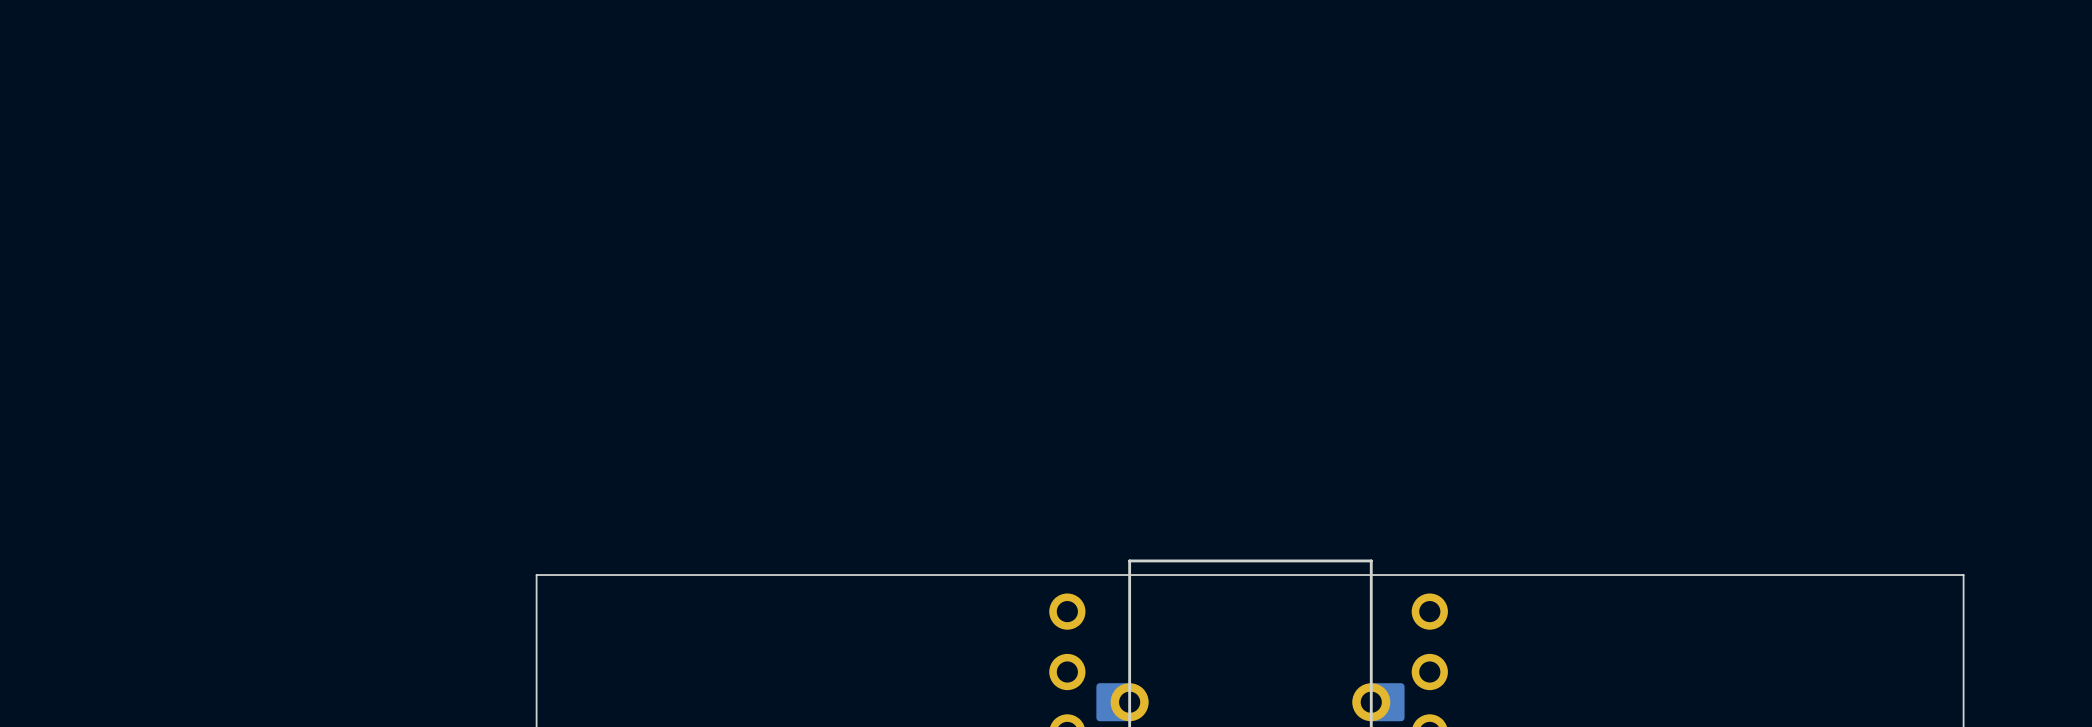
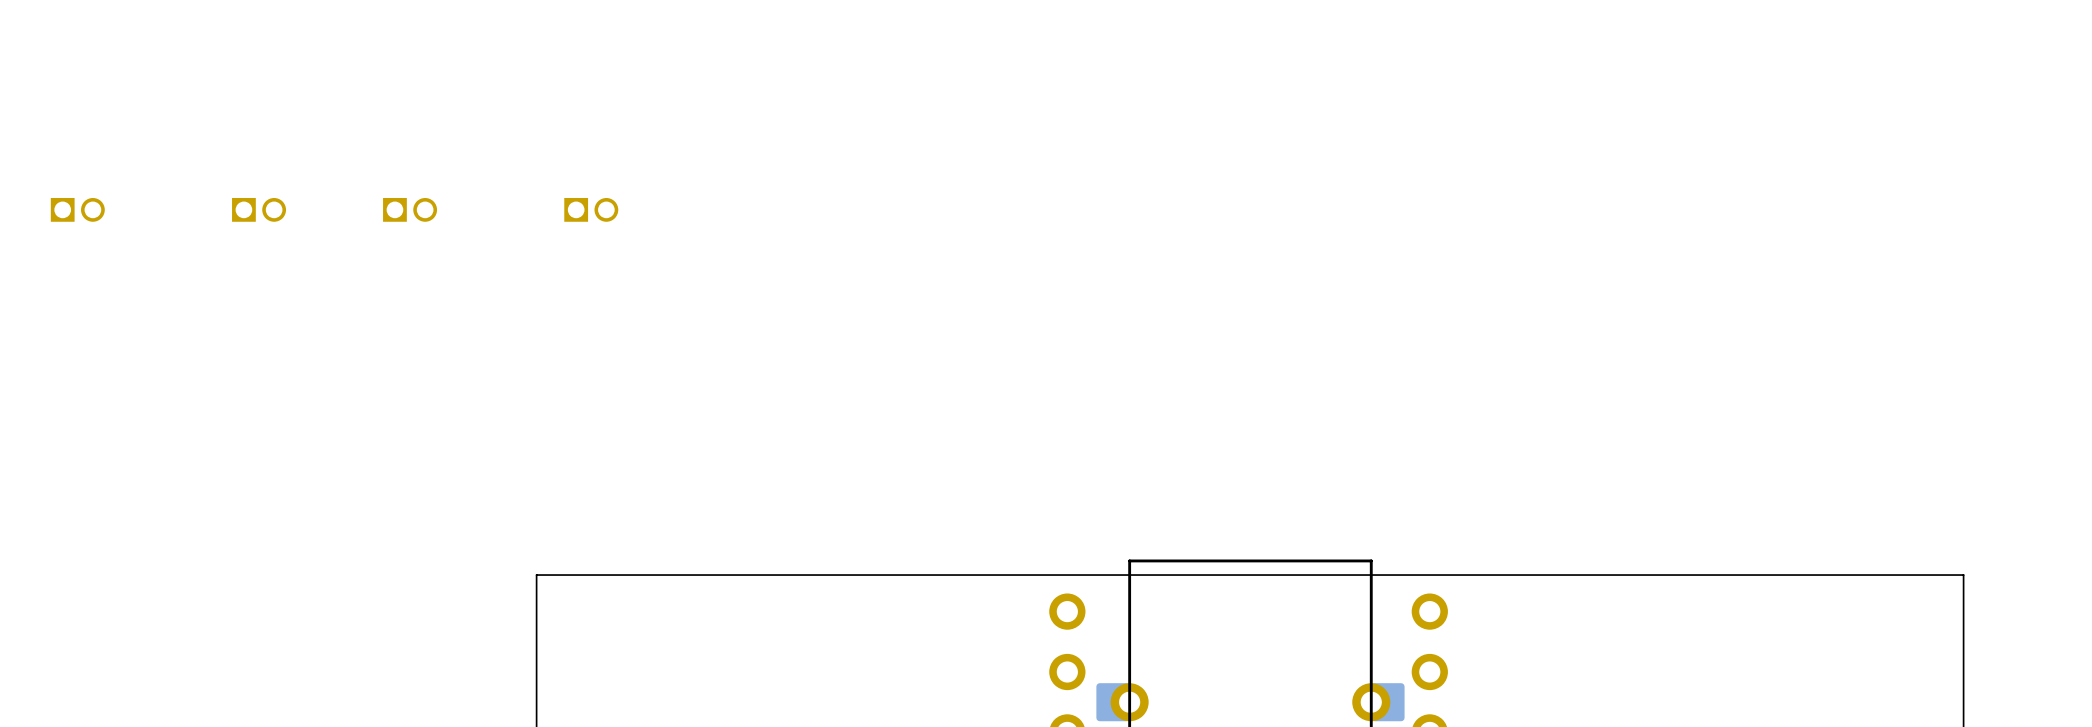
part: none -> (77, 209)
part: none -> (259, 209)
part: none -> (410, 209)
part: none -> (591, 209)

